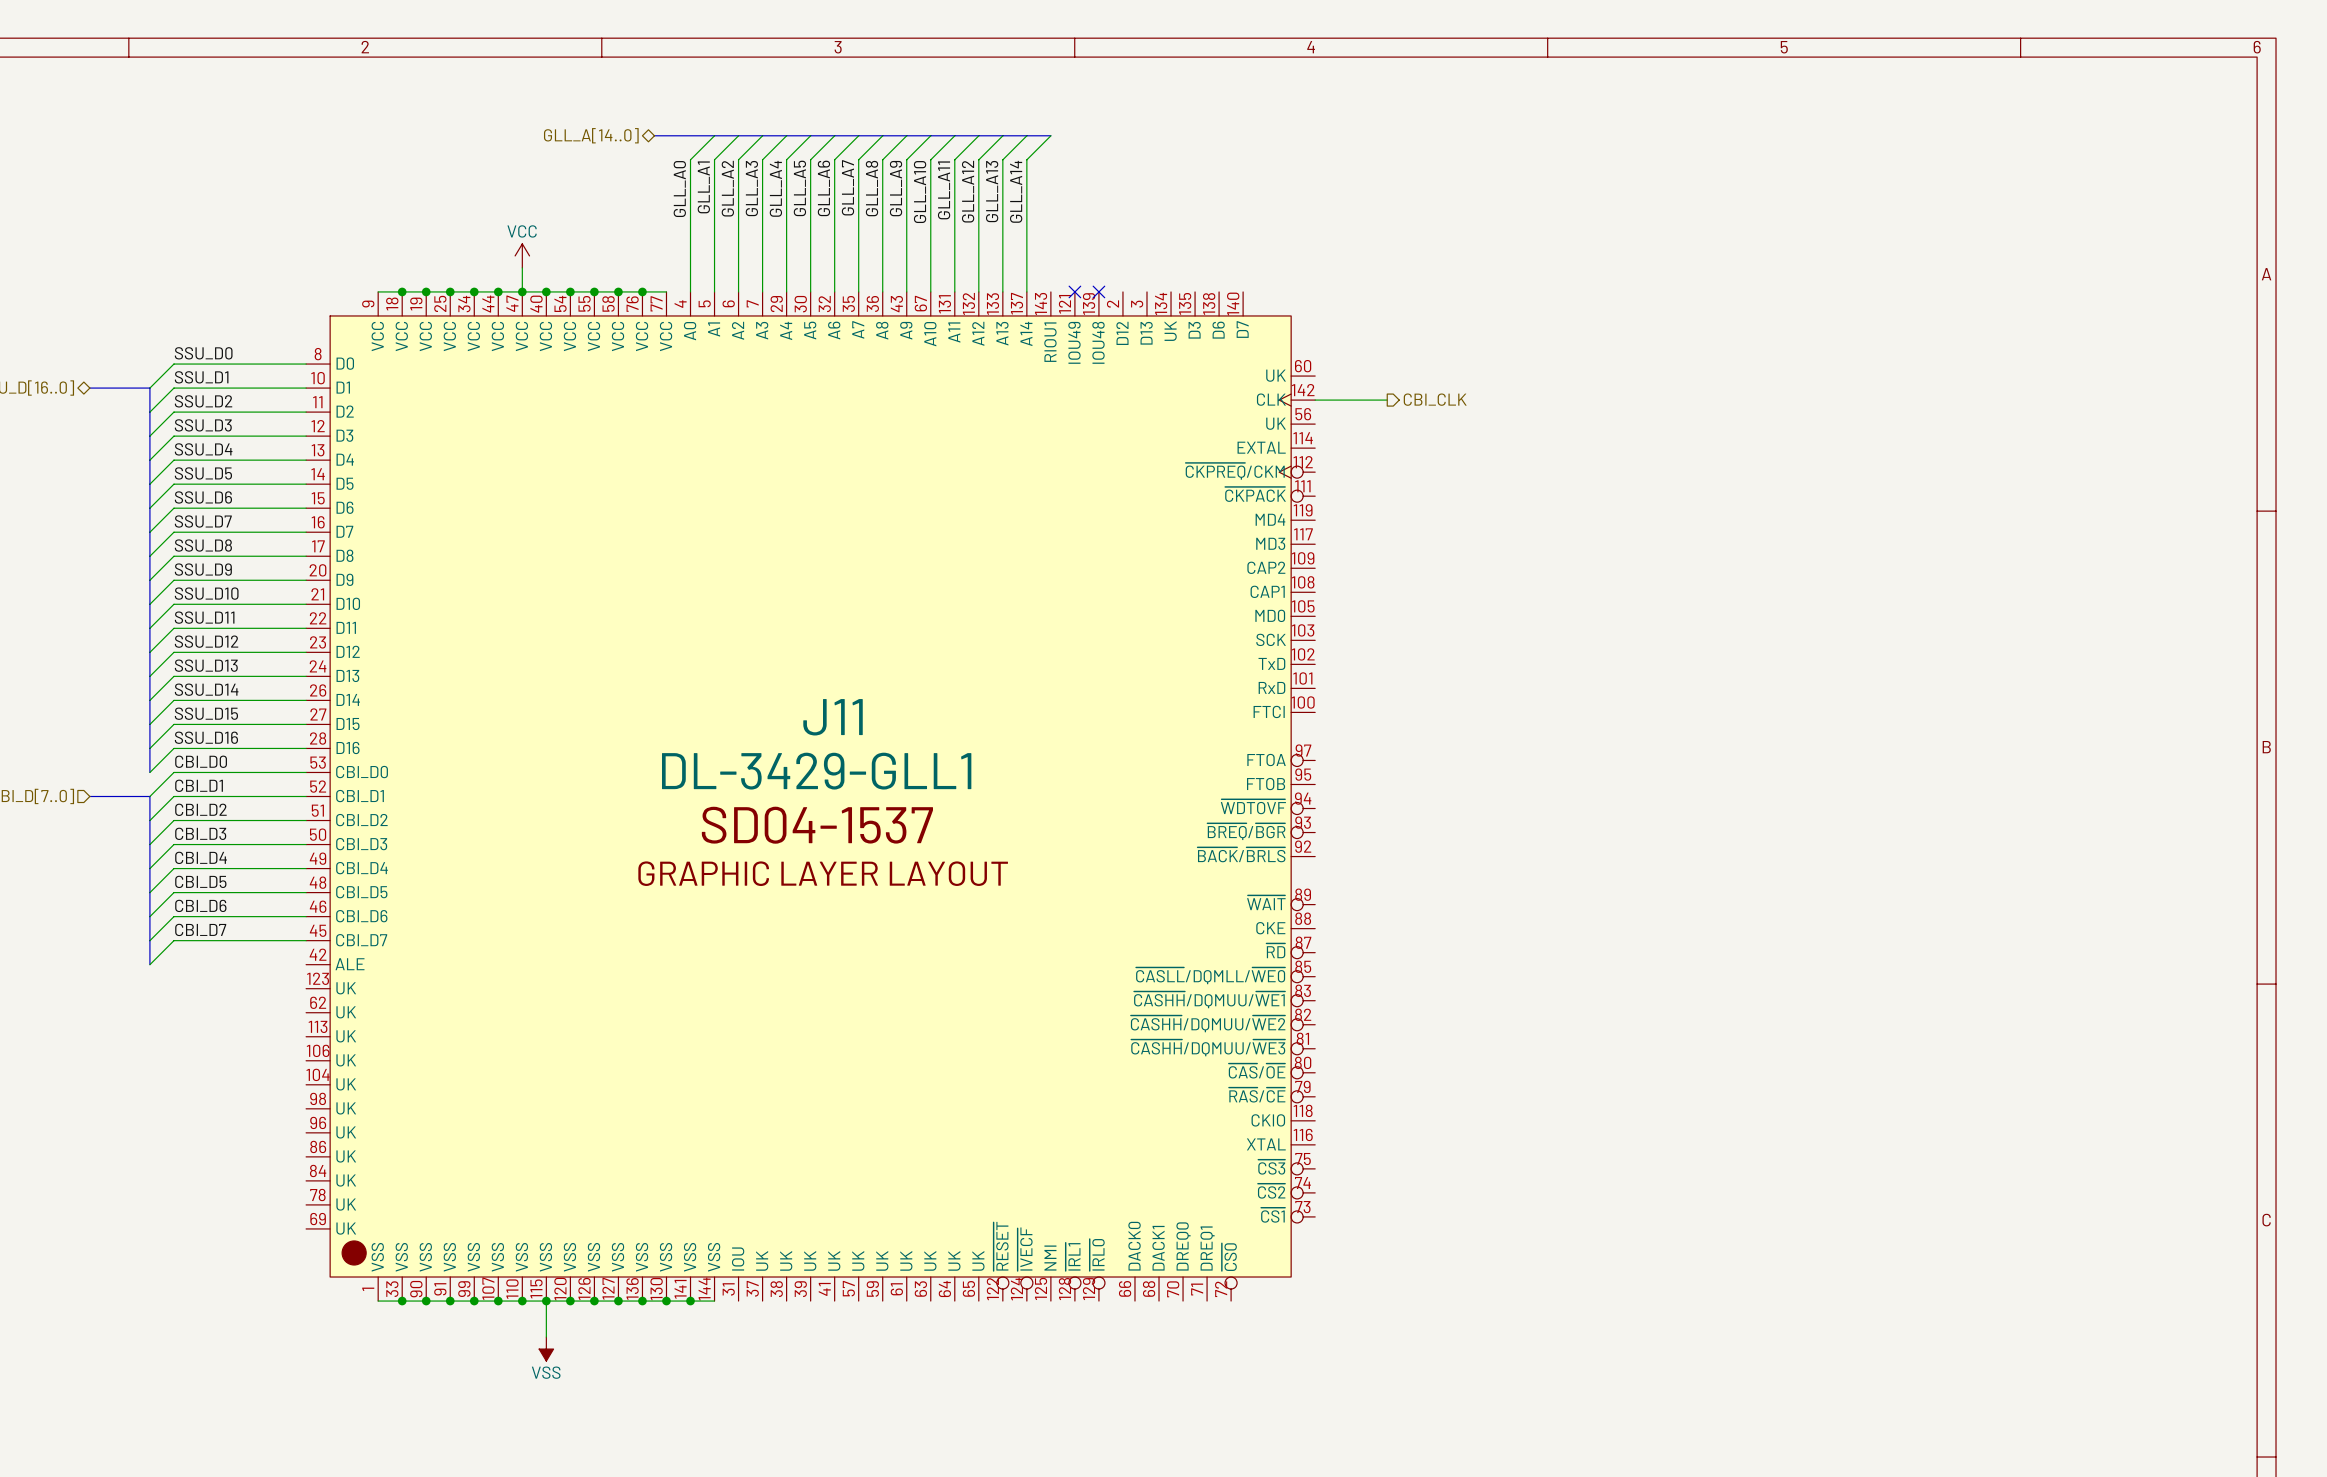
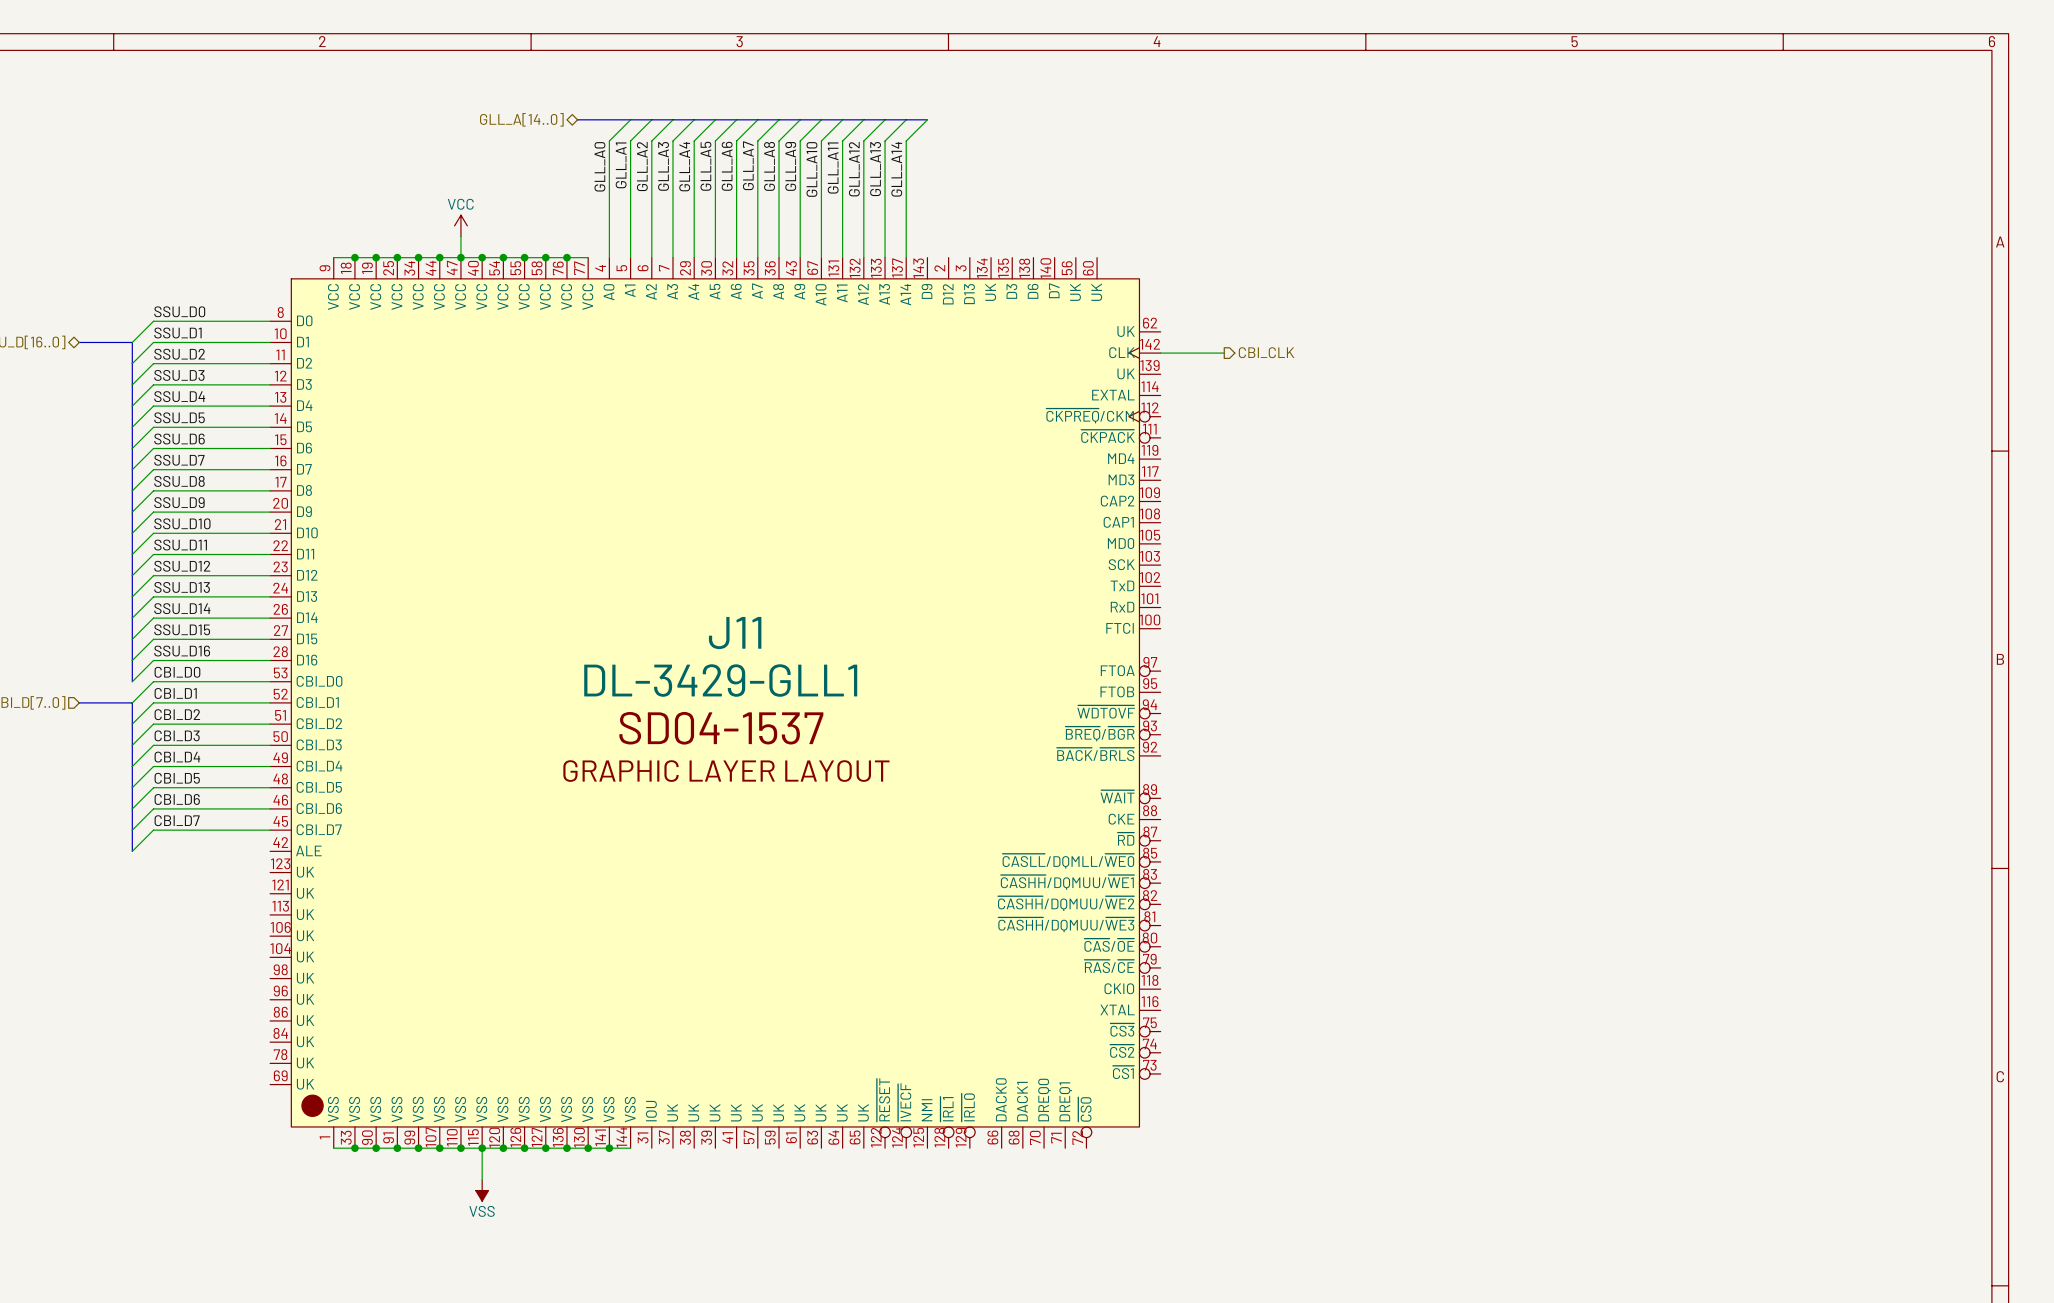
J11 symbol: [306, 291, 1316, 1302] -> [270, 257, 1161, 1149]
no-connect mark: (1074, 291) -> none
no-connect mark: (1098, 291) -> none

